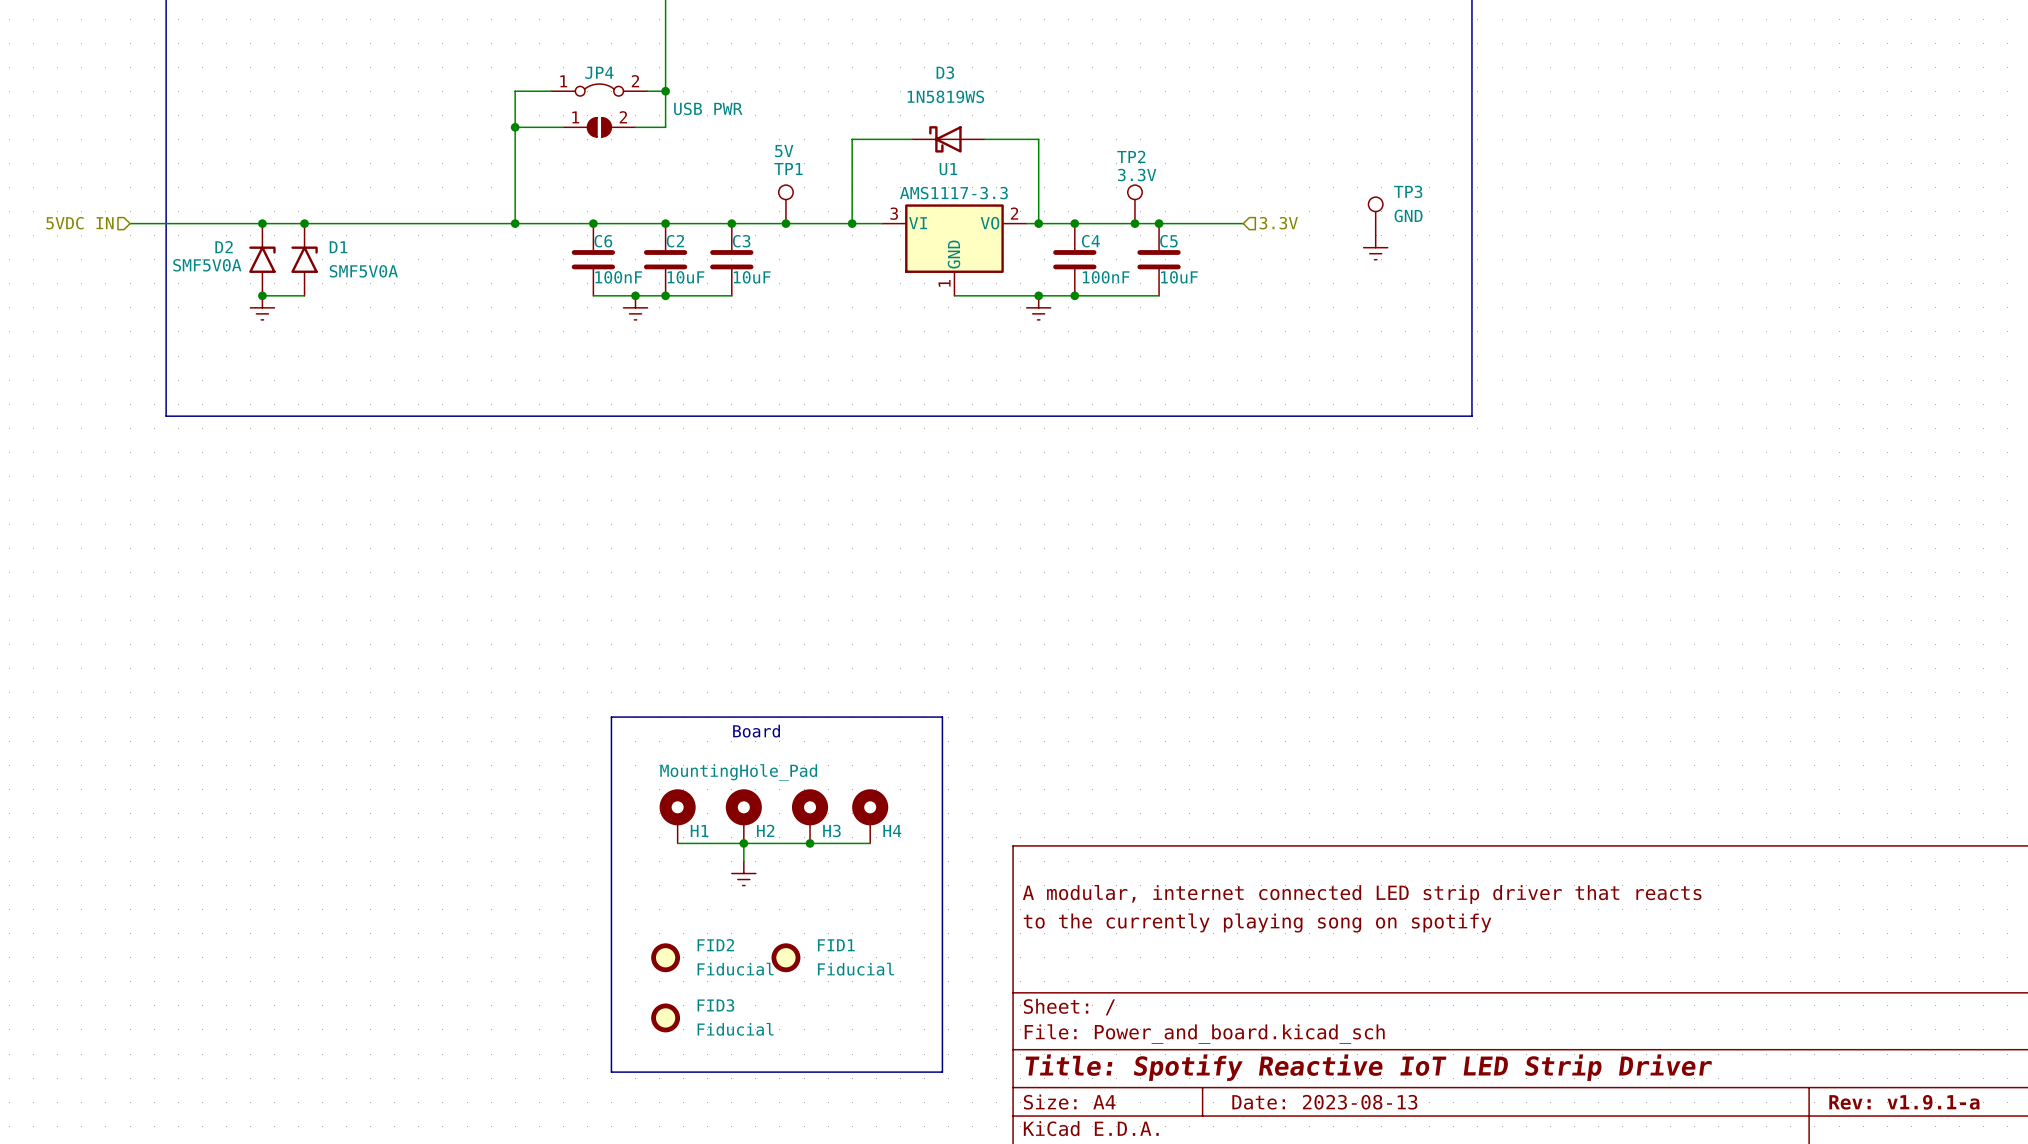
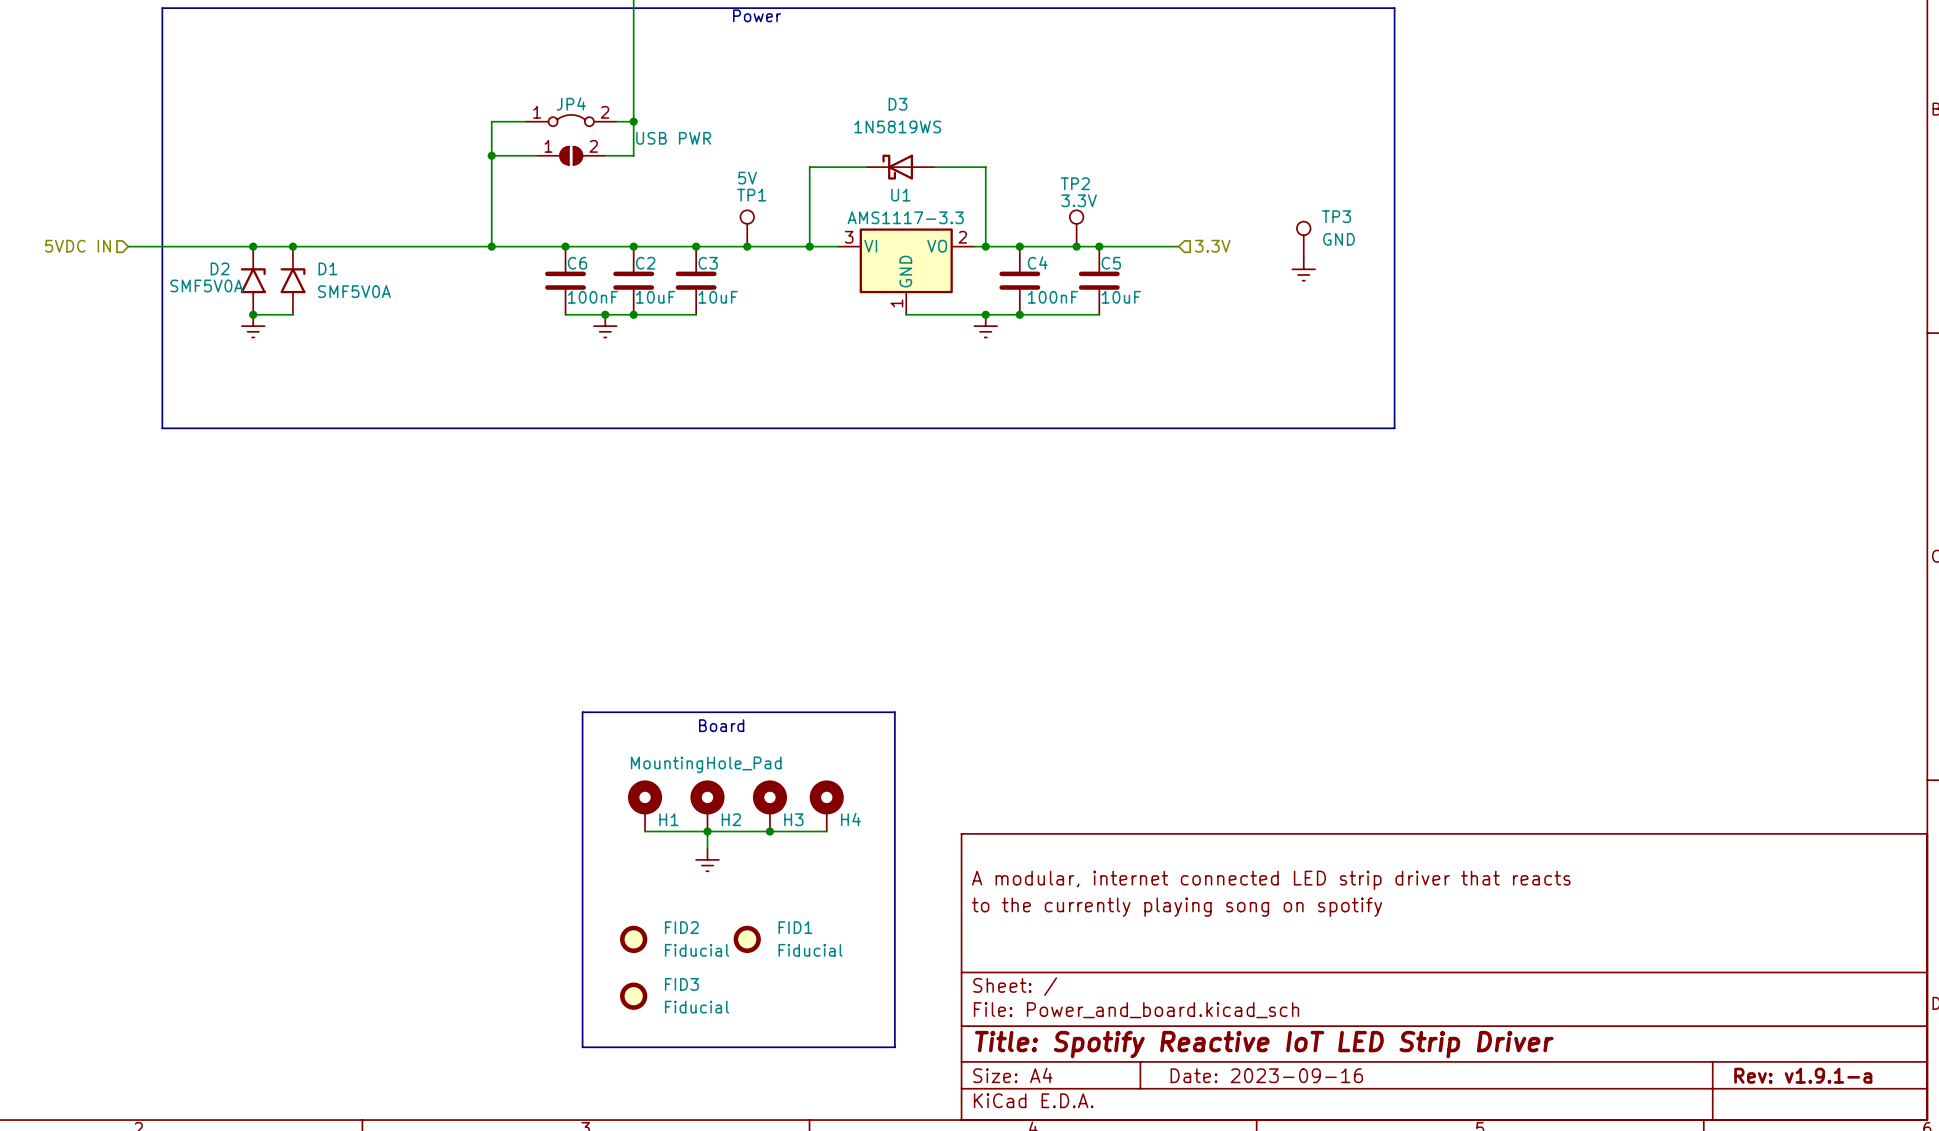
title block: Date: 2023-08-13 (1324, 1102) -> Date: 2023-09-16 (1266, 1075)

